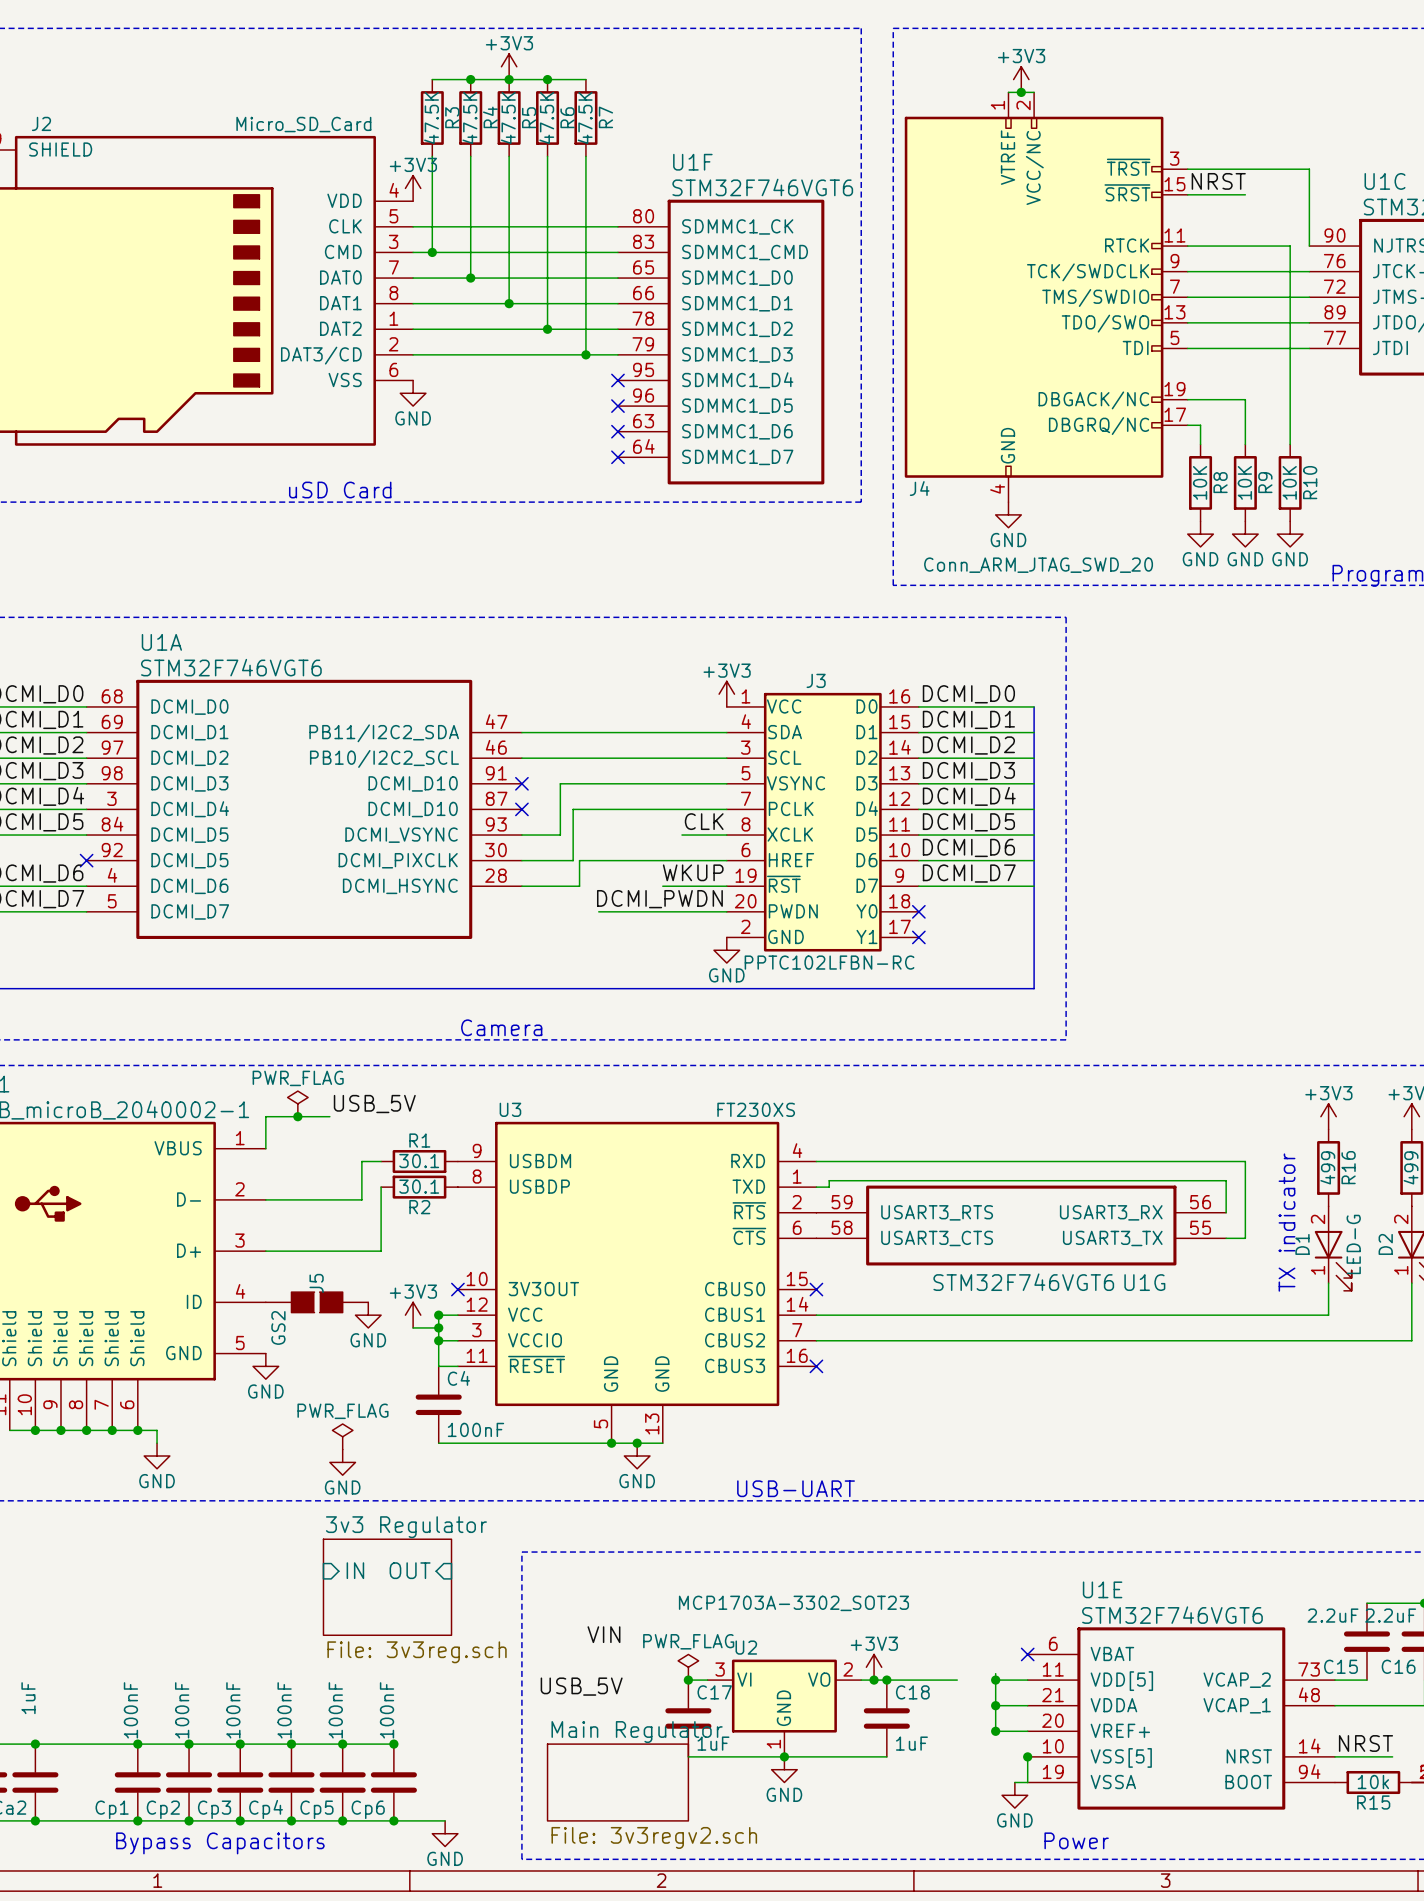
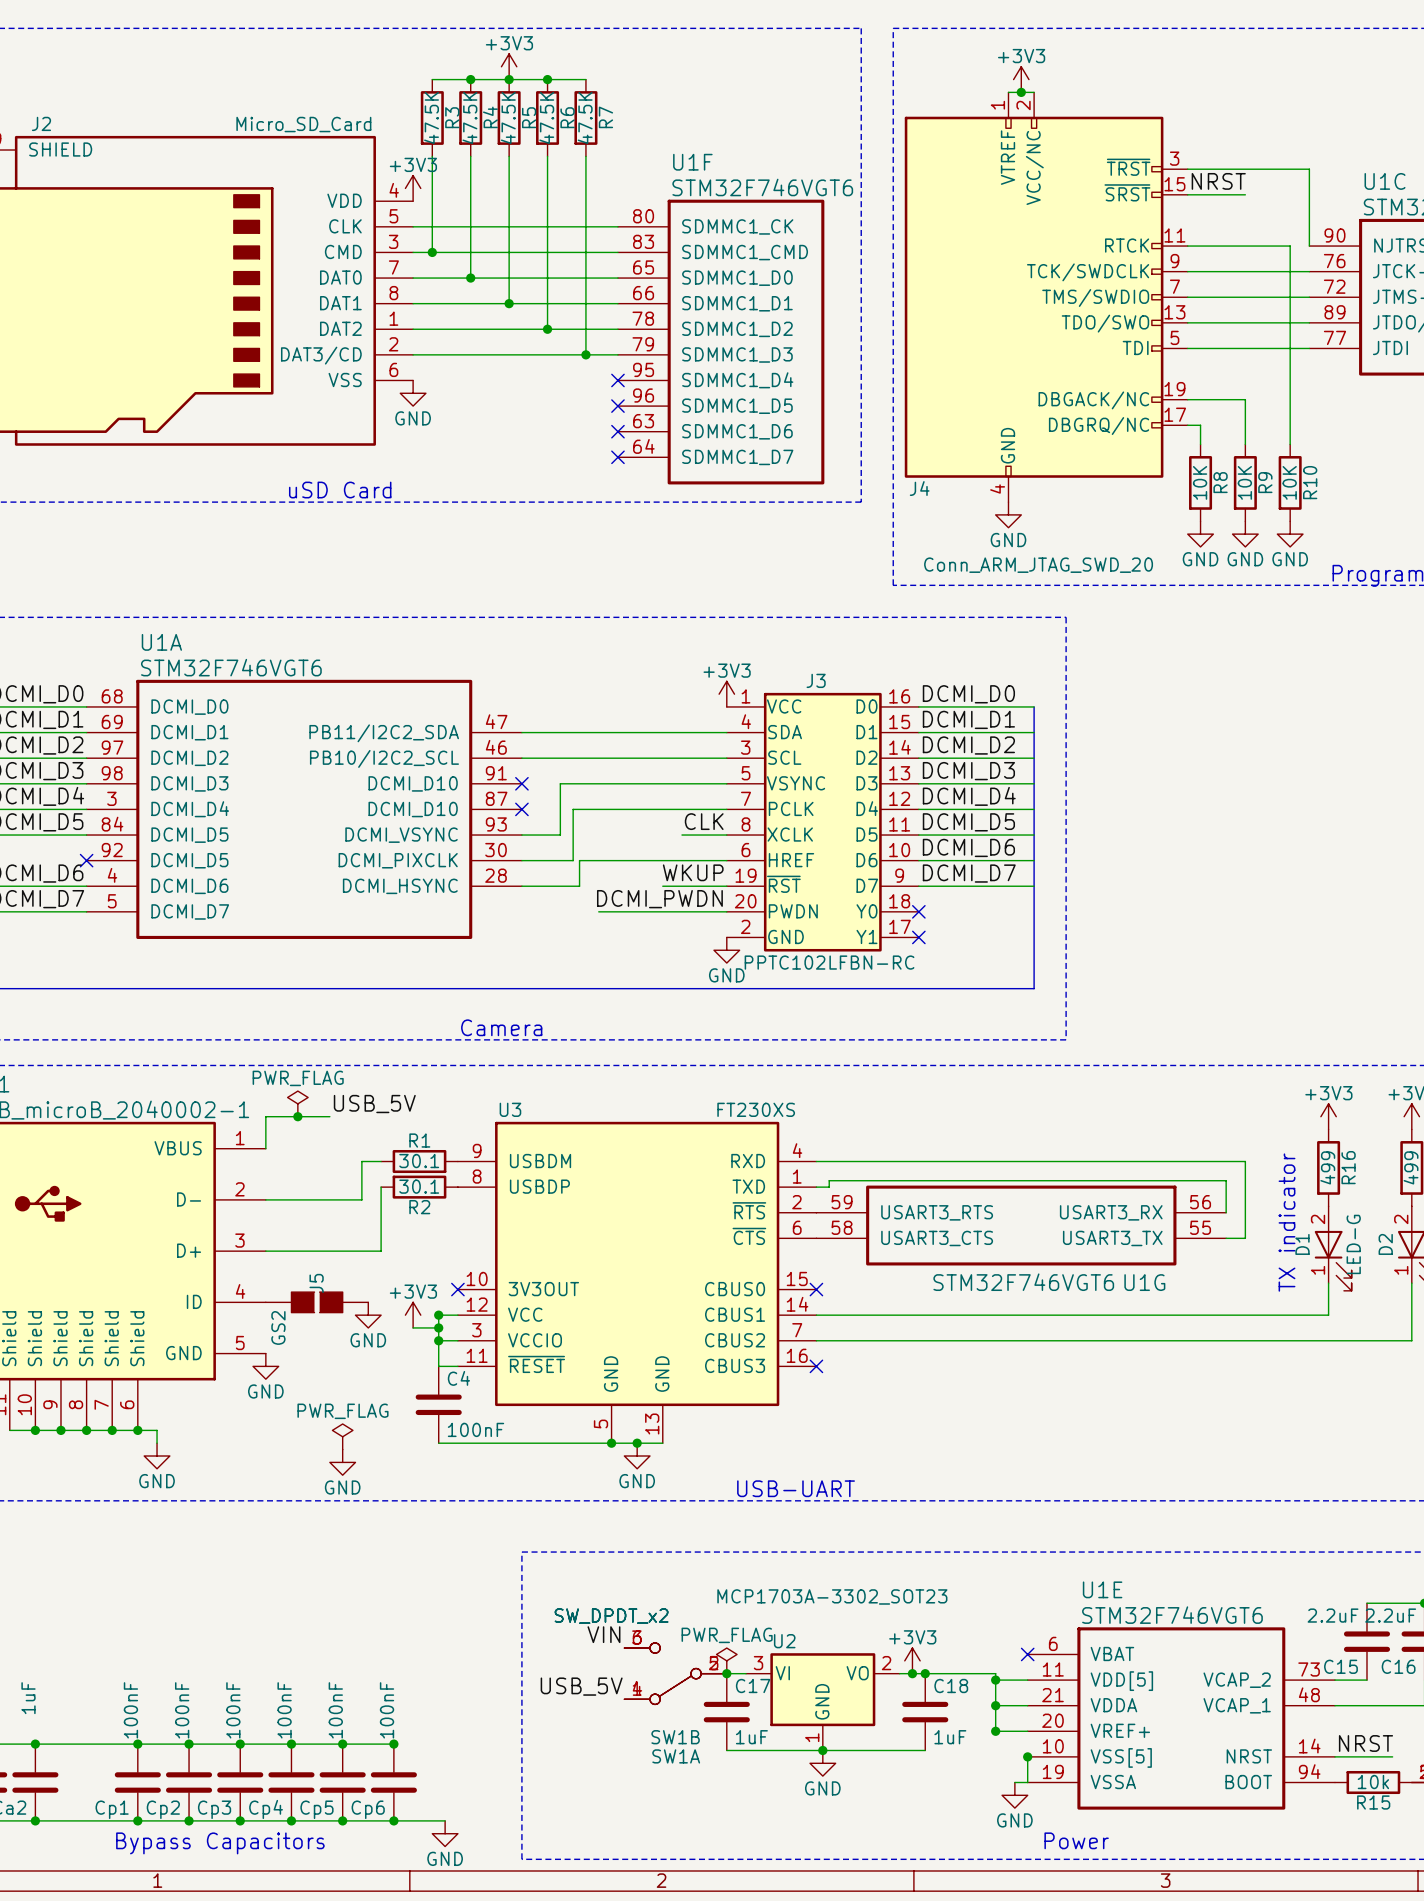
sheet pin: IN (355, 1570) -> none
sheet pin: OUT (410, 1570) -> none
sheet 3v3 Regulator: File: 3v3reg.sch (387, 1587) -> none
power symbol position: PWR_FLAG (688, 1667) -> PWR_FLAG (726, 1660)
power symbol position: +3V3 (874, 1667) -> +3V3 (912, 1660)
SW1A: none -> SW_DPDT_x2 (675, 1673)
SW1B: none -> SW_DPDT_x2 (675, 1673)
junction: none -> (912, 1673)
junction: none -> (925, 1673)
junction position: (688, 1680) -> (726, 1673)
wire: (861, 1680) (957, 1680) -> (899, 1673) (995, 1673)
junction: (874, 1680) -> none
junction: (886, 1680) -> none
U2 position: (784, 1708) -> (822, 1701)
C17 position: (688, 1718) -> (726, 1712)
C18 position: (886, 1718) -> (925, 1712)
wire: (688, 1756) (886, 1756) -> (726, 1750) (925, 1750)
junction position: (784, 1756) -> (822, 1750)
power symbol position: GND (784, 1769) -> GND (822, 1763)
sheet Main Regulator: File: 3v3regv2.sch (617, 1782) -> none

